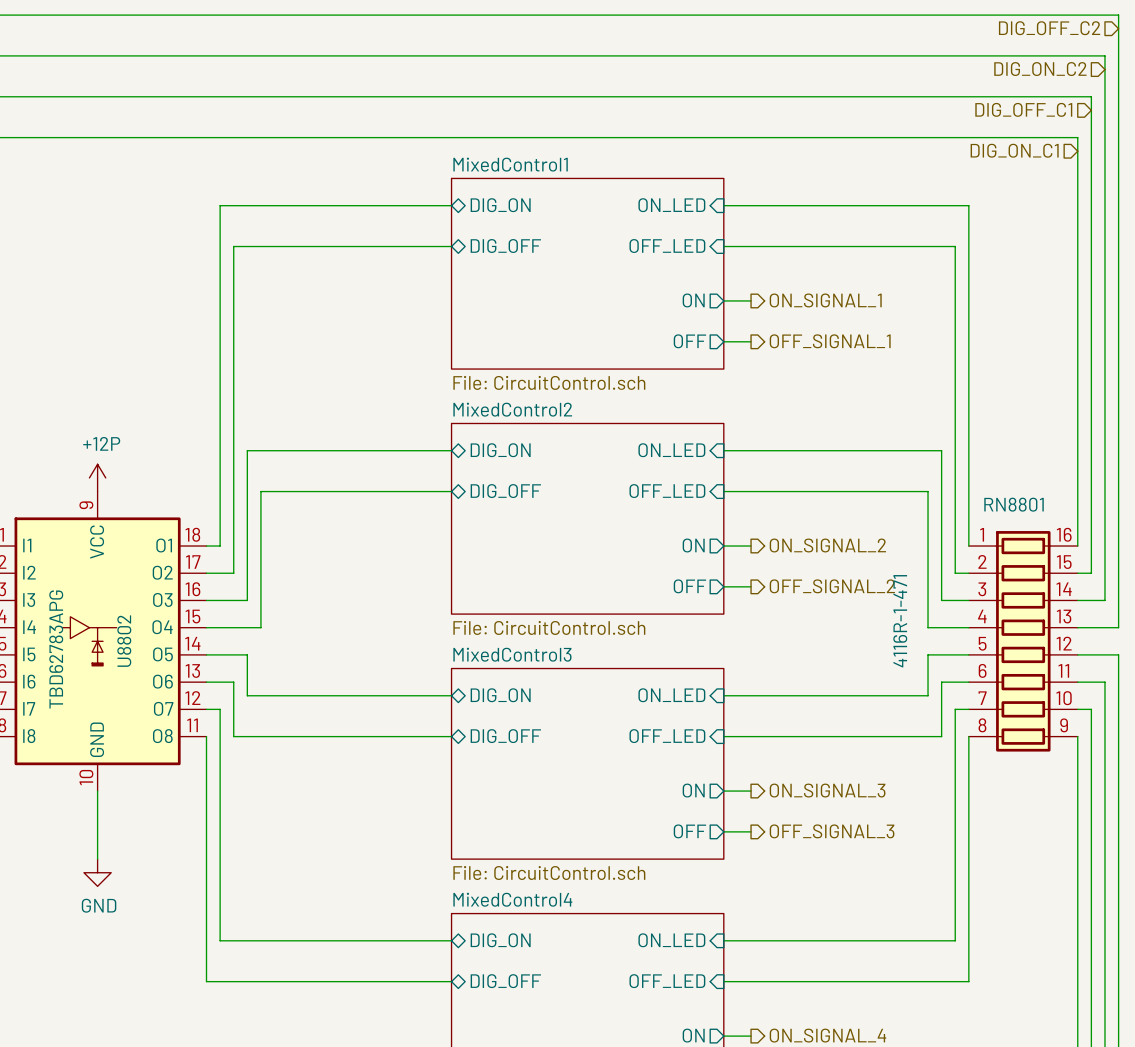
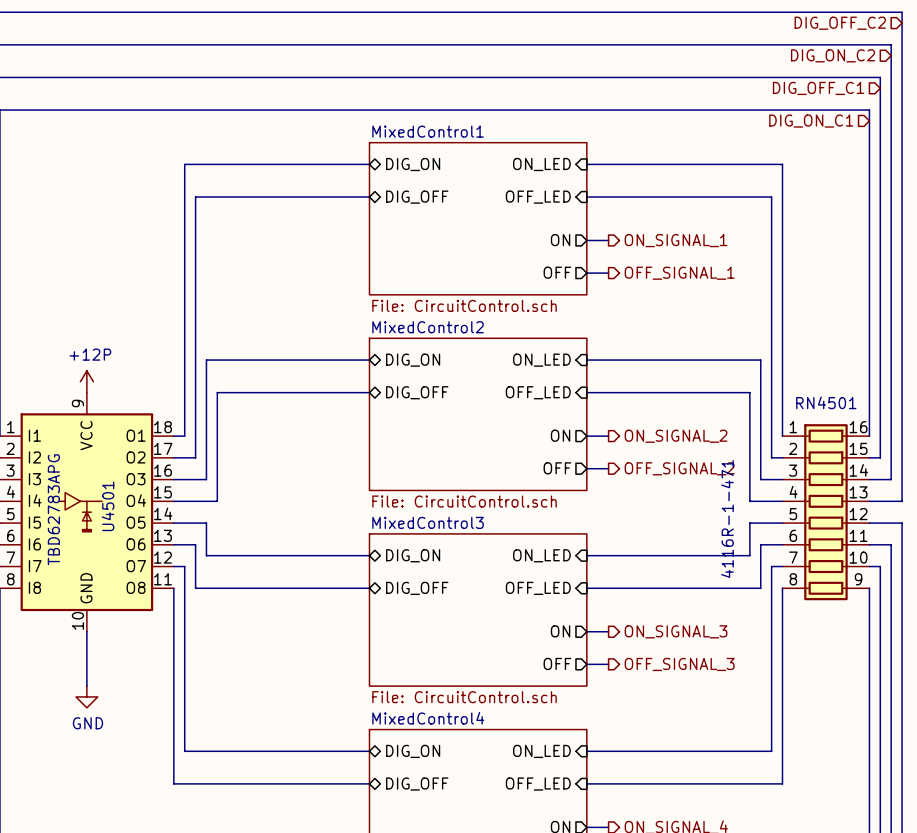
RN8801 name: RN8801 (1014, 504) -> RN4501 (826, 402)
U8802 name: U8802 (124, 641) -> U4501 (107, 506)

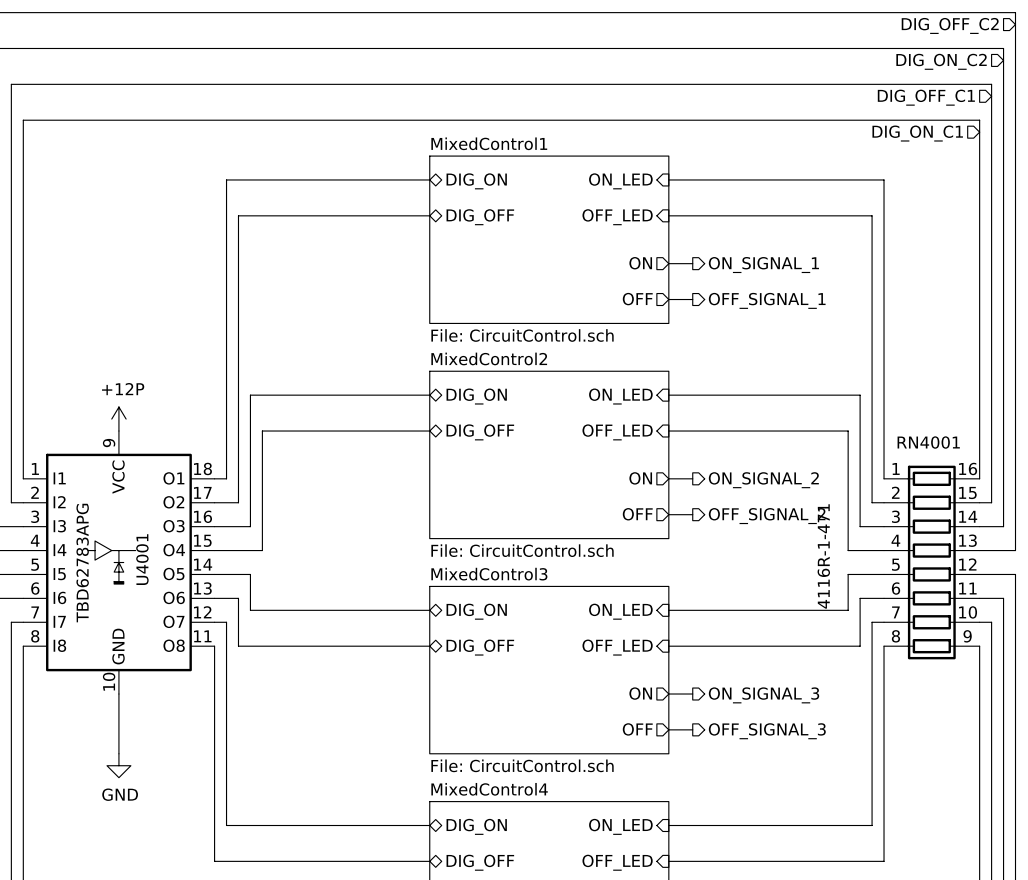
RN4501 name: RN4501 (826, 402) -> RN4001 (928, 442)
U4501 name: U4501 (107, 506) -> U4001 (142, 559)

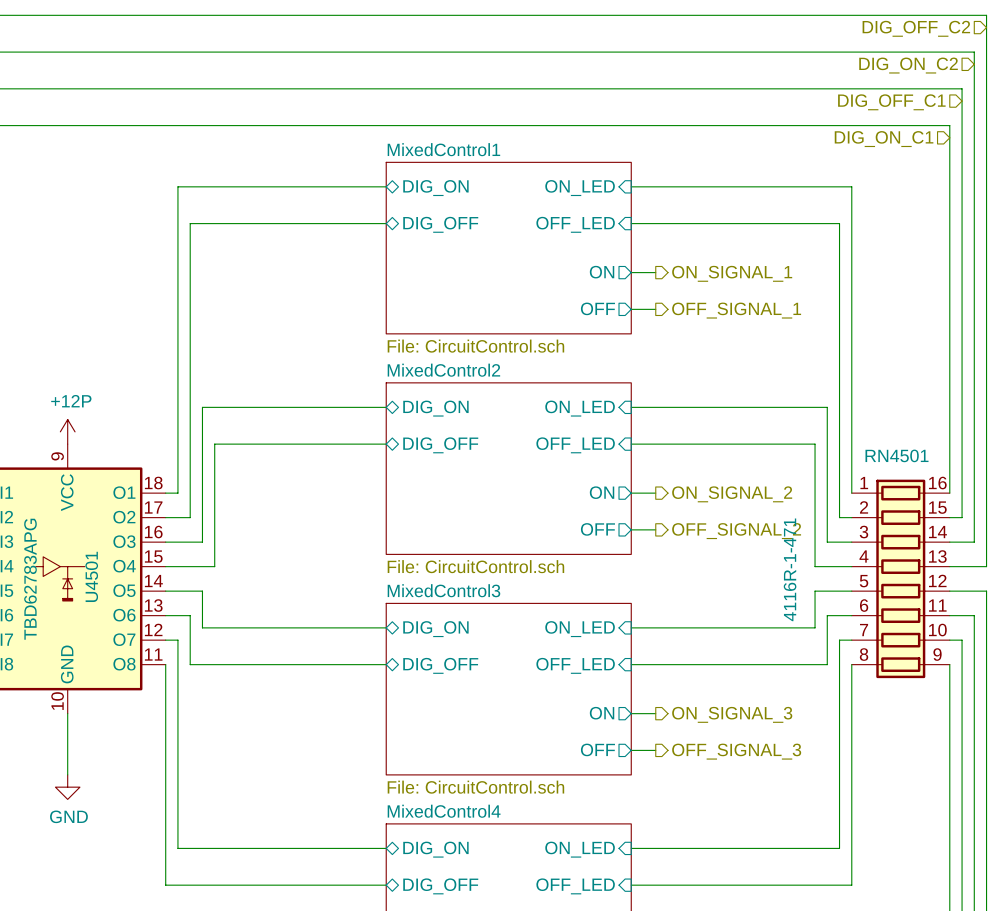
RN4001 name: RN4001 (928, 442) -> RN4501 (896, 455)
U4001 name: U4001 (142, 559) -> U4501 (91, 576)

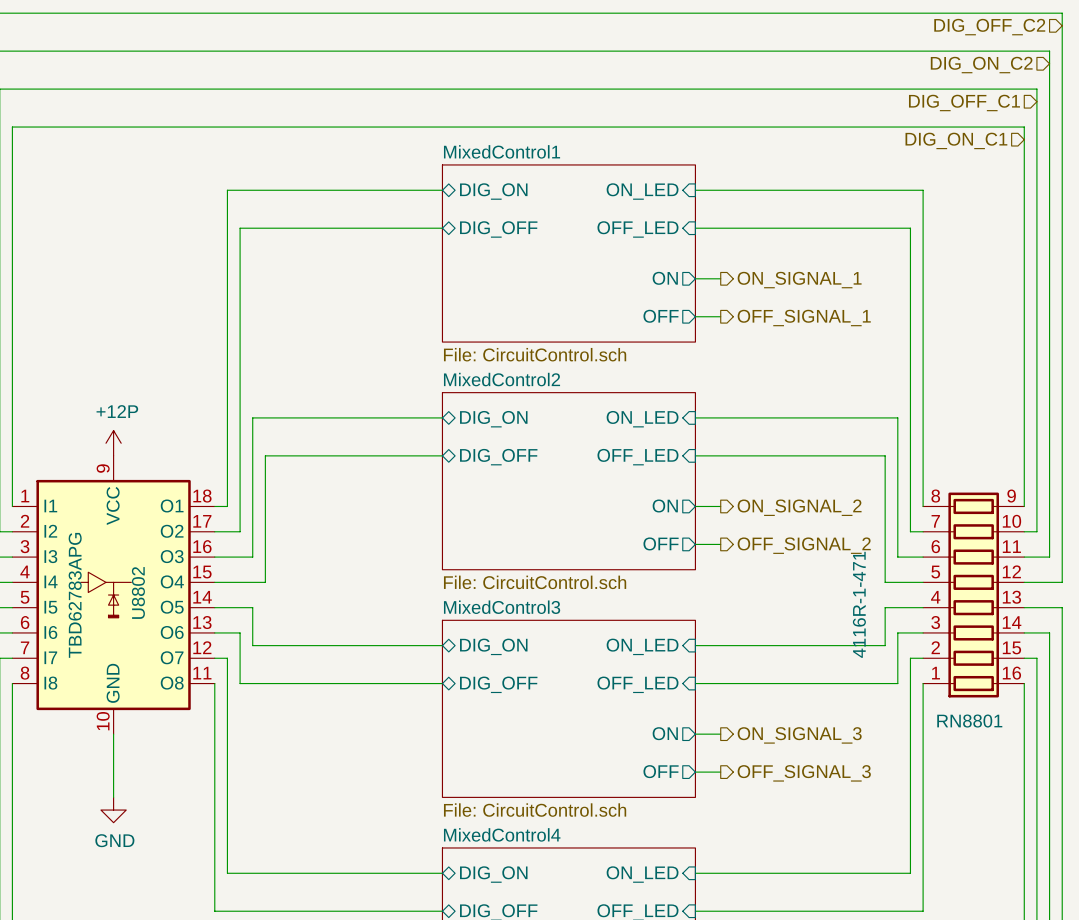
RN4501 name: RN4501 (896, 455) -> RN8801 (969, 721)
U4501 name: U4501 (91, 576) -> U8802 (138, 592)
RN4501 flip: as is (900, 578) -> up-down (973, 595)

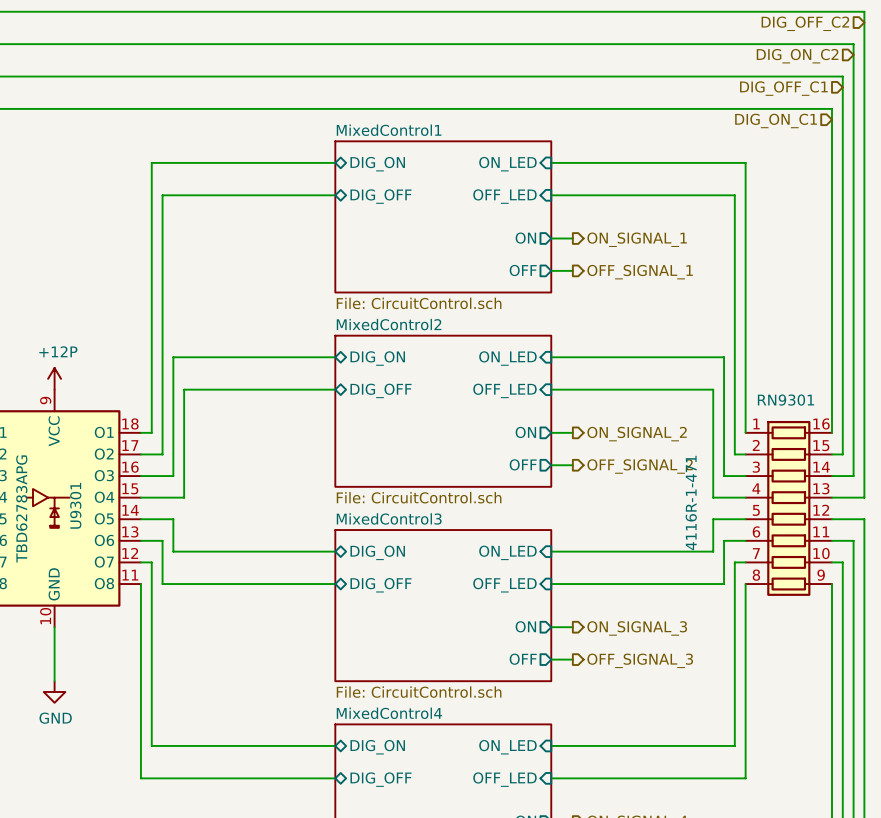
U8802 name: U8802 (138, 592) -> U9301 (75, 505)
RN8801 flip: as is (973, 595) -> up-down (788, 508)
RN8801 name: RN8801 (969, 721) -> RN9301 (785, 400)

